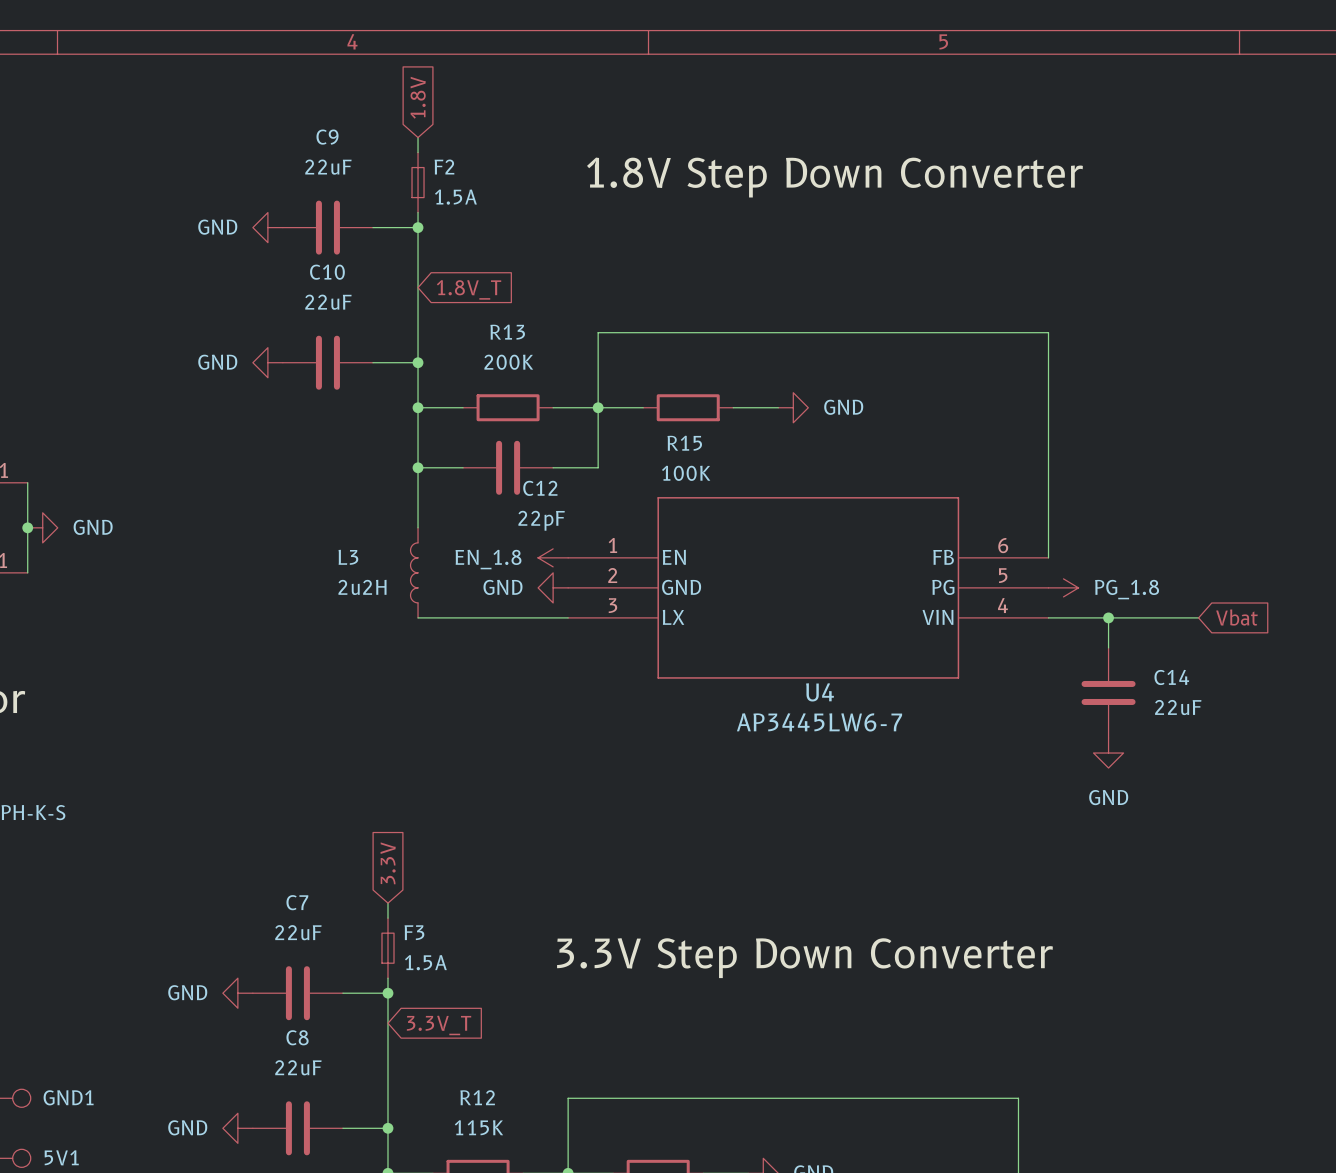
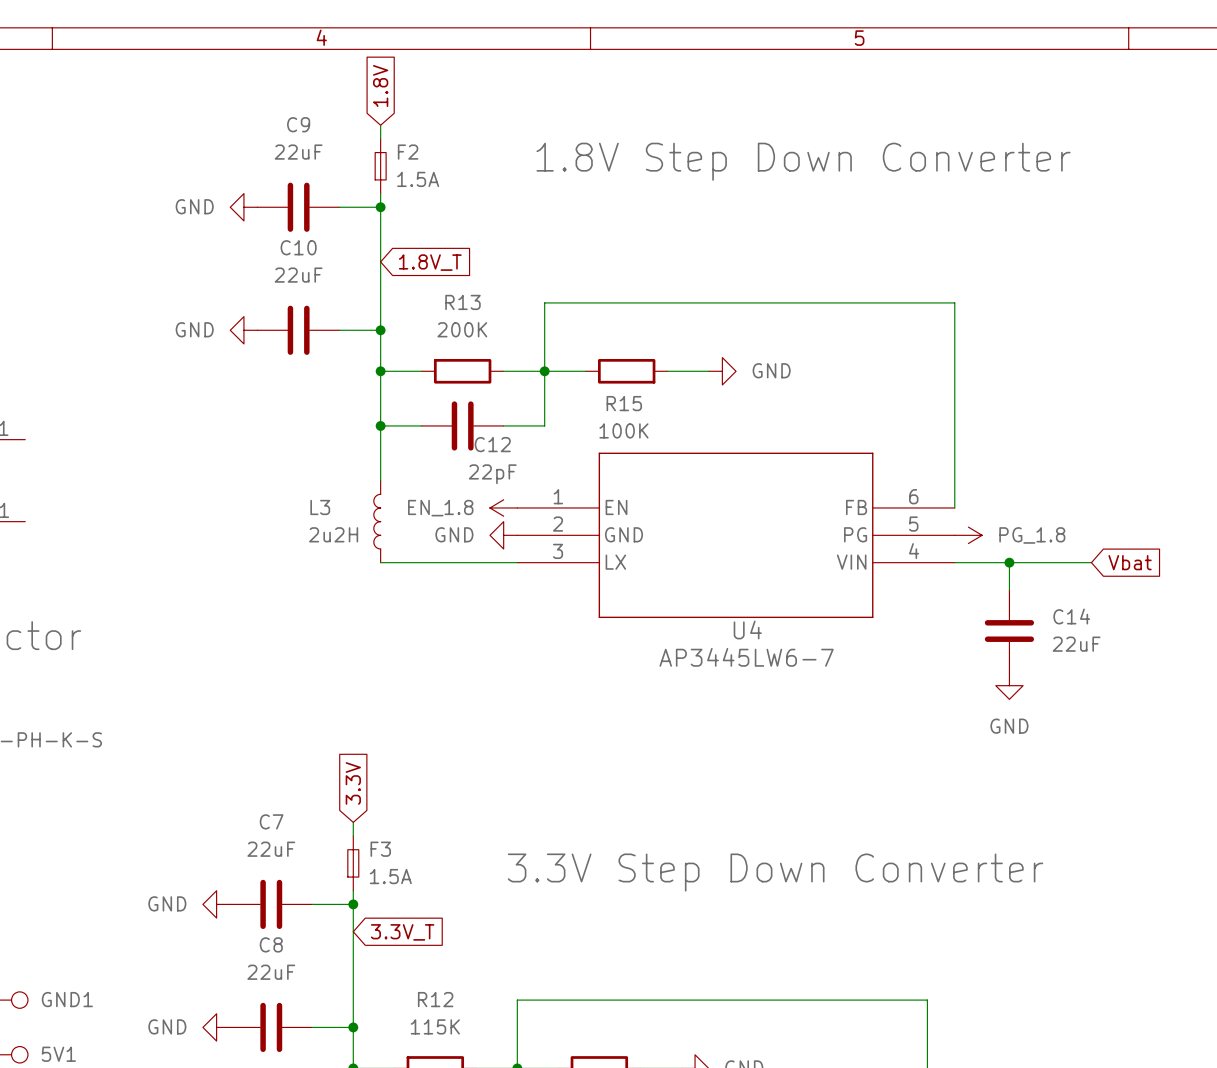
wire: (27, 482) (27, 572) -> none
junction: (27, 527) -> none
power symbol: GND (42, 527) -> none

